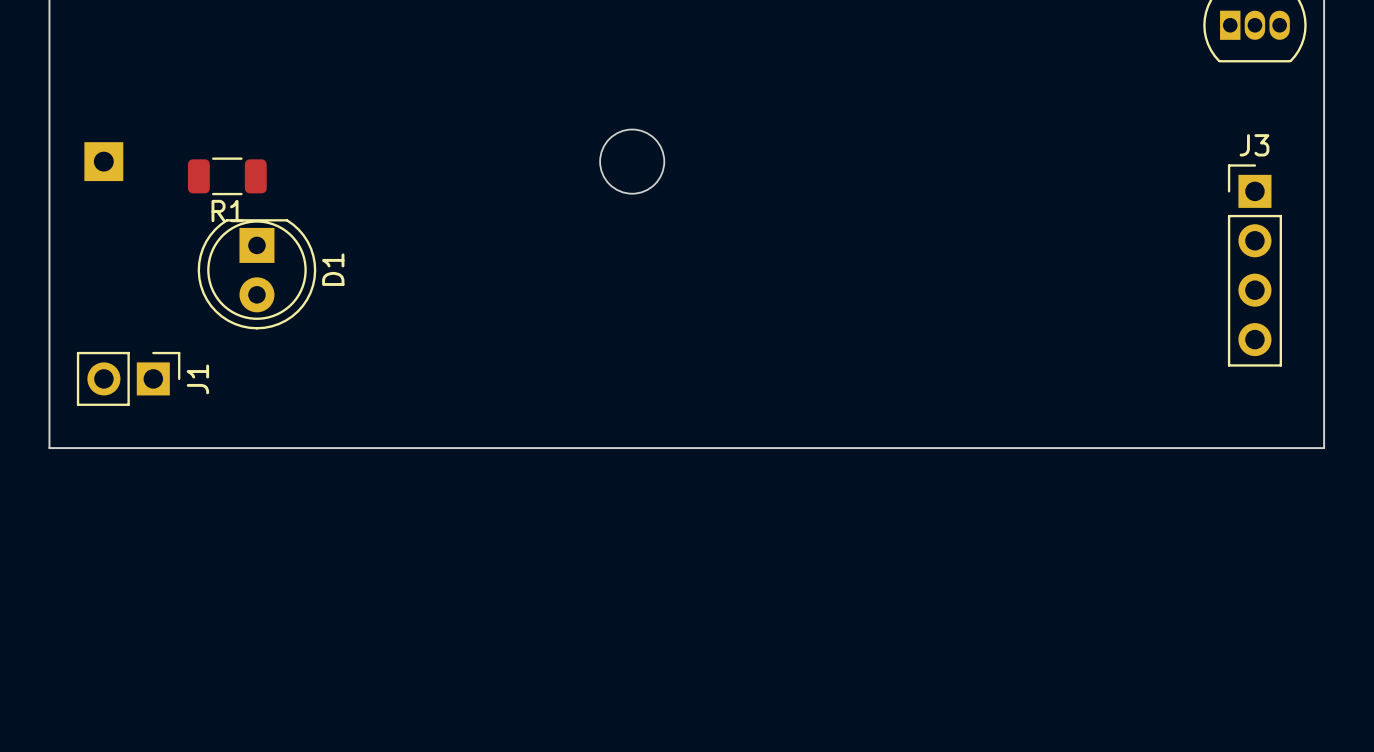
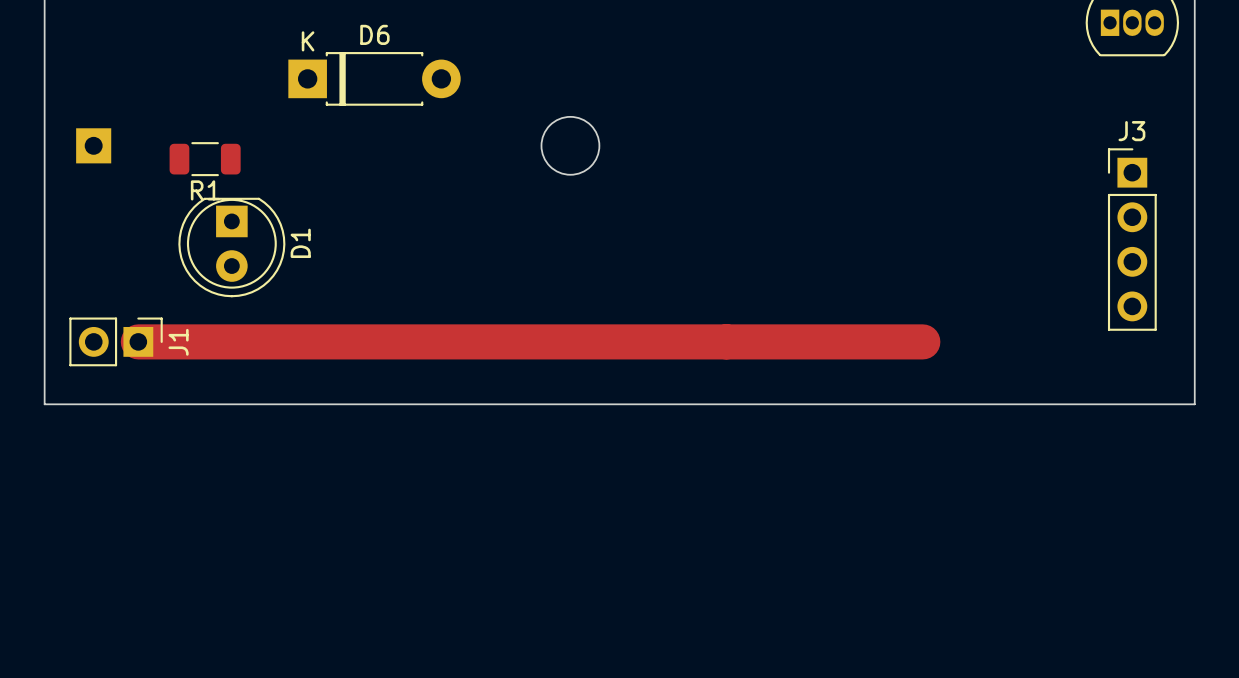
D6: none -> (374, 78)
track: none -> (138, 341) (922, 341)

